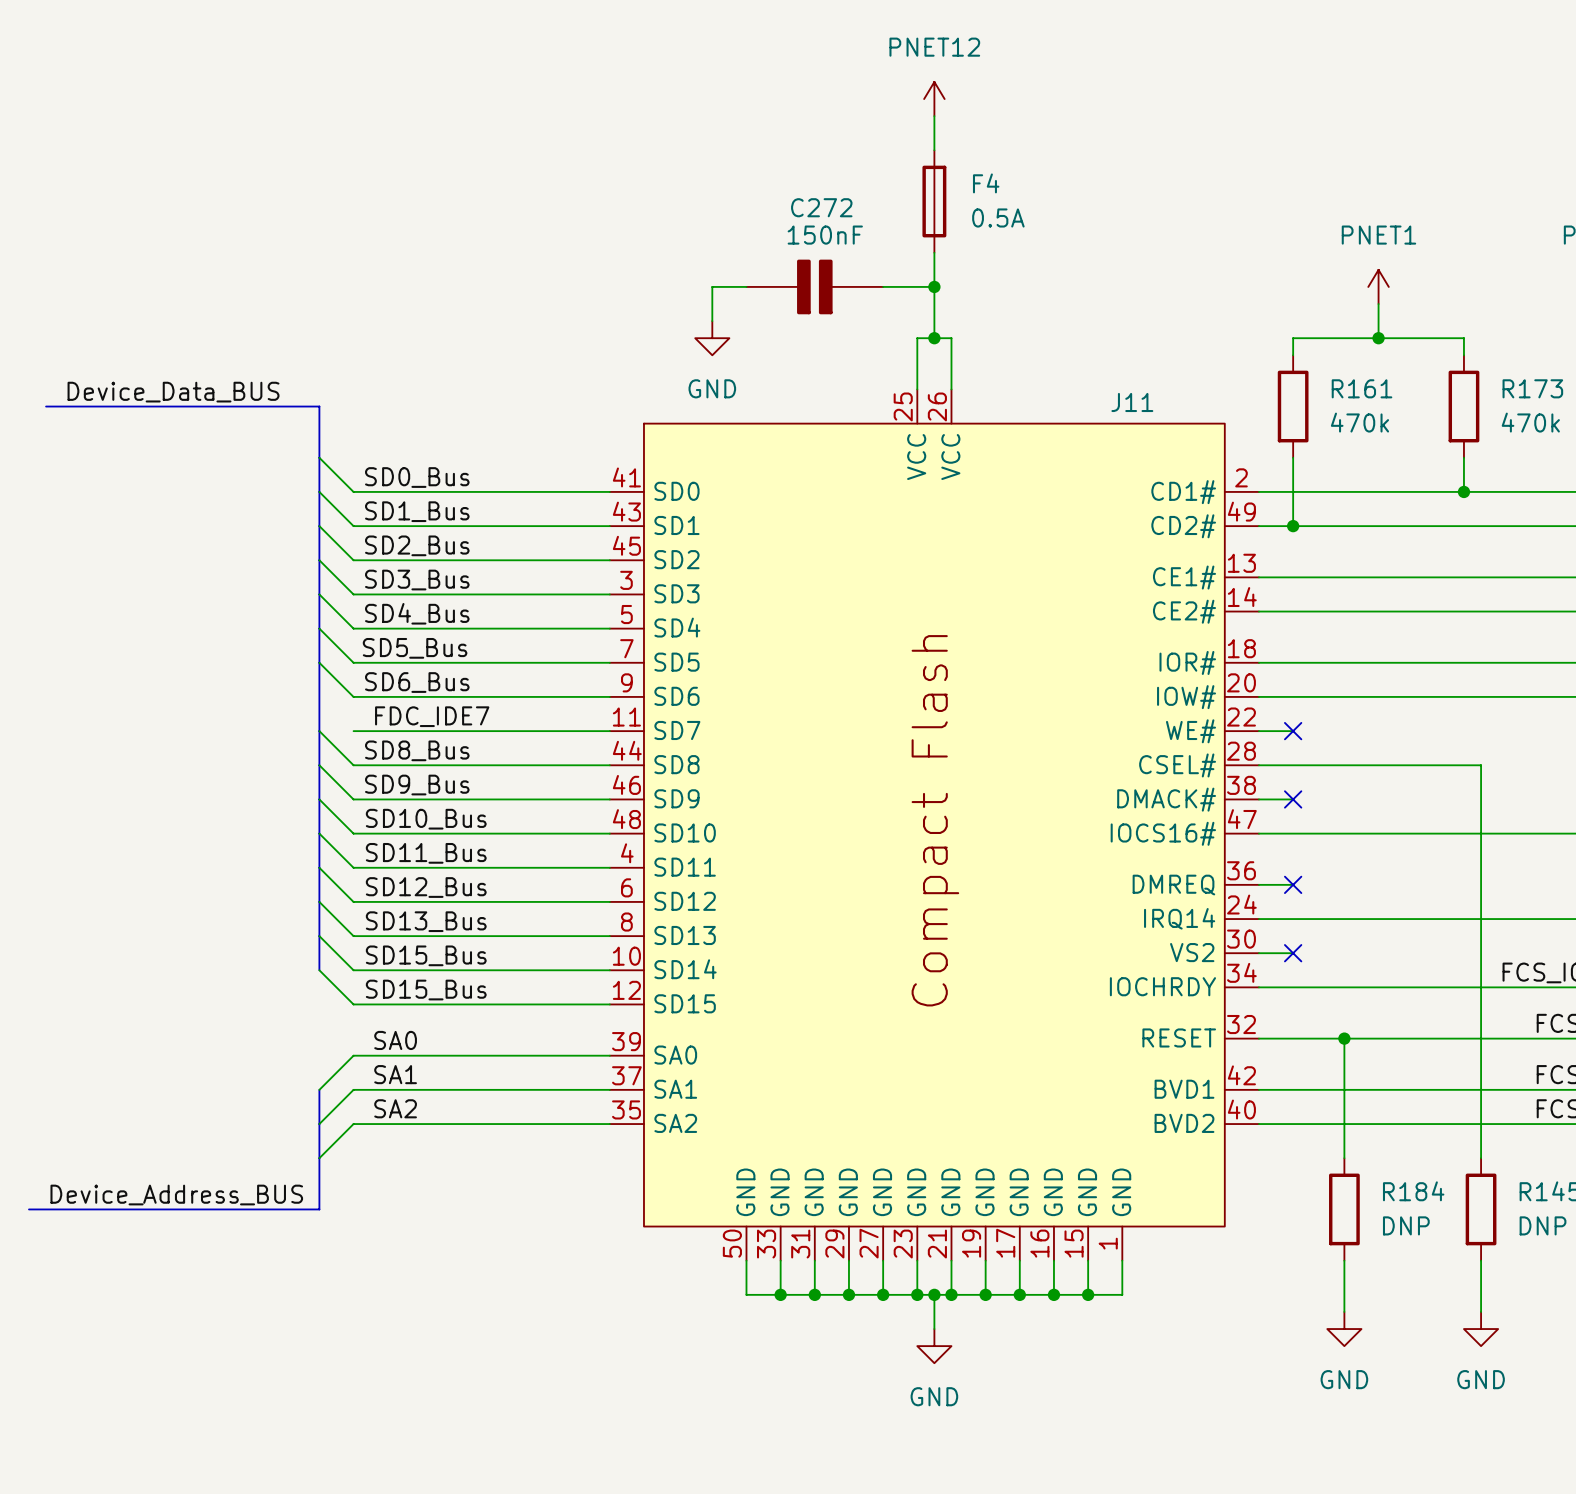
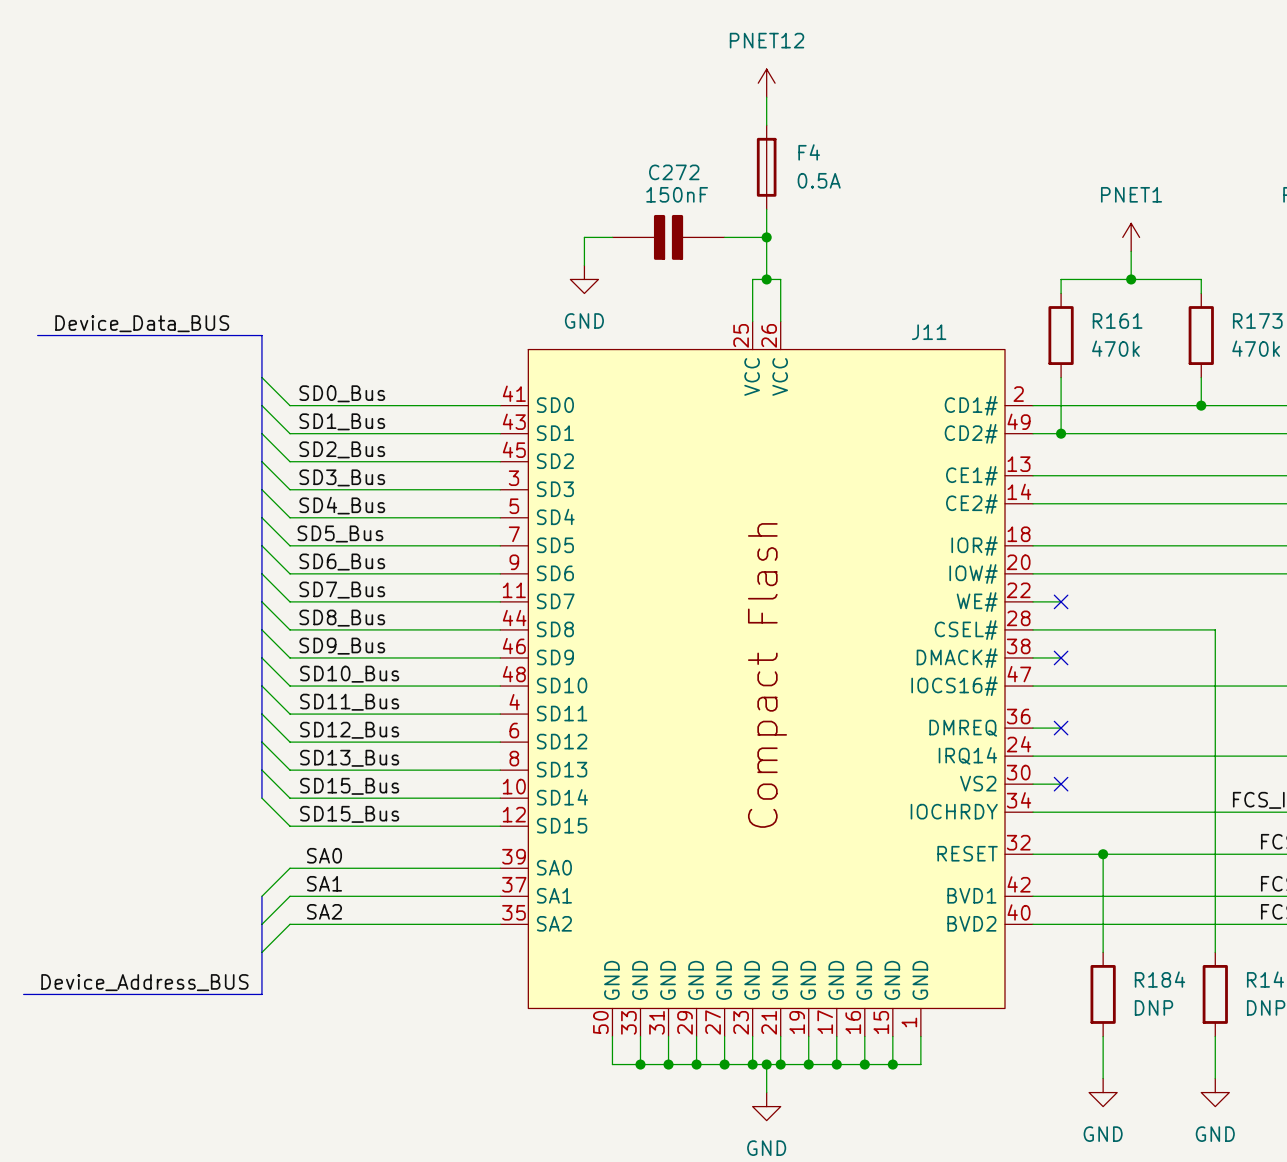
wire: none -> (261, 573) (290, 601)
label: none -> SD7_Bus (342, 590)
label: FDC_IDE7 (432, 716) -> none

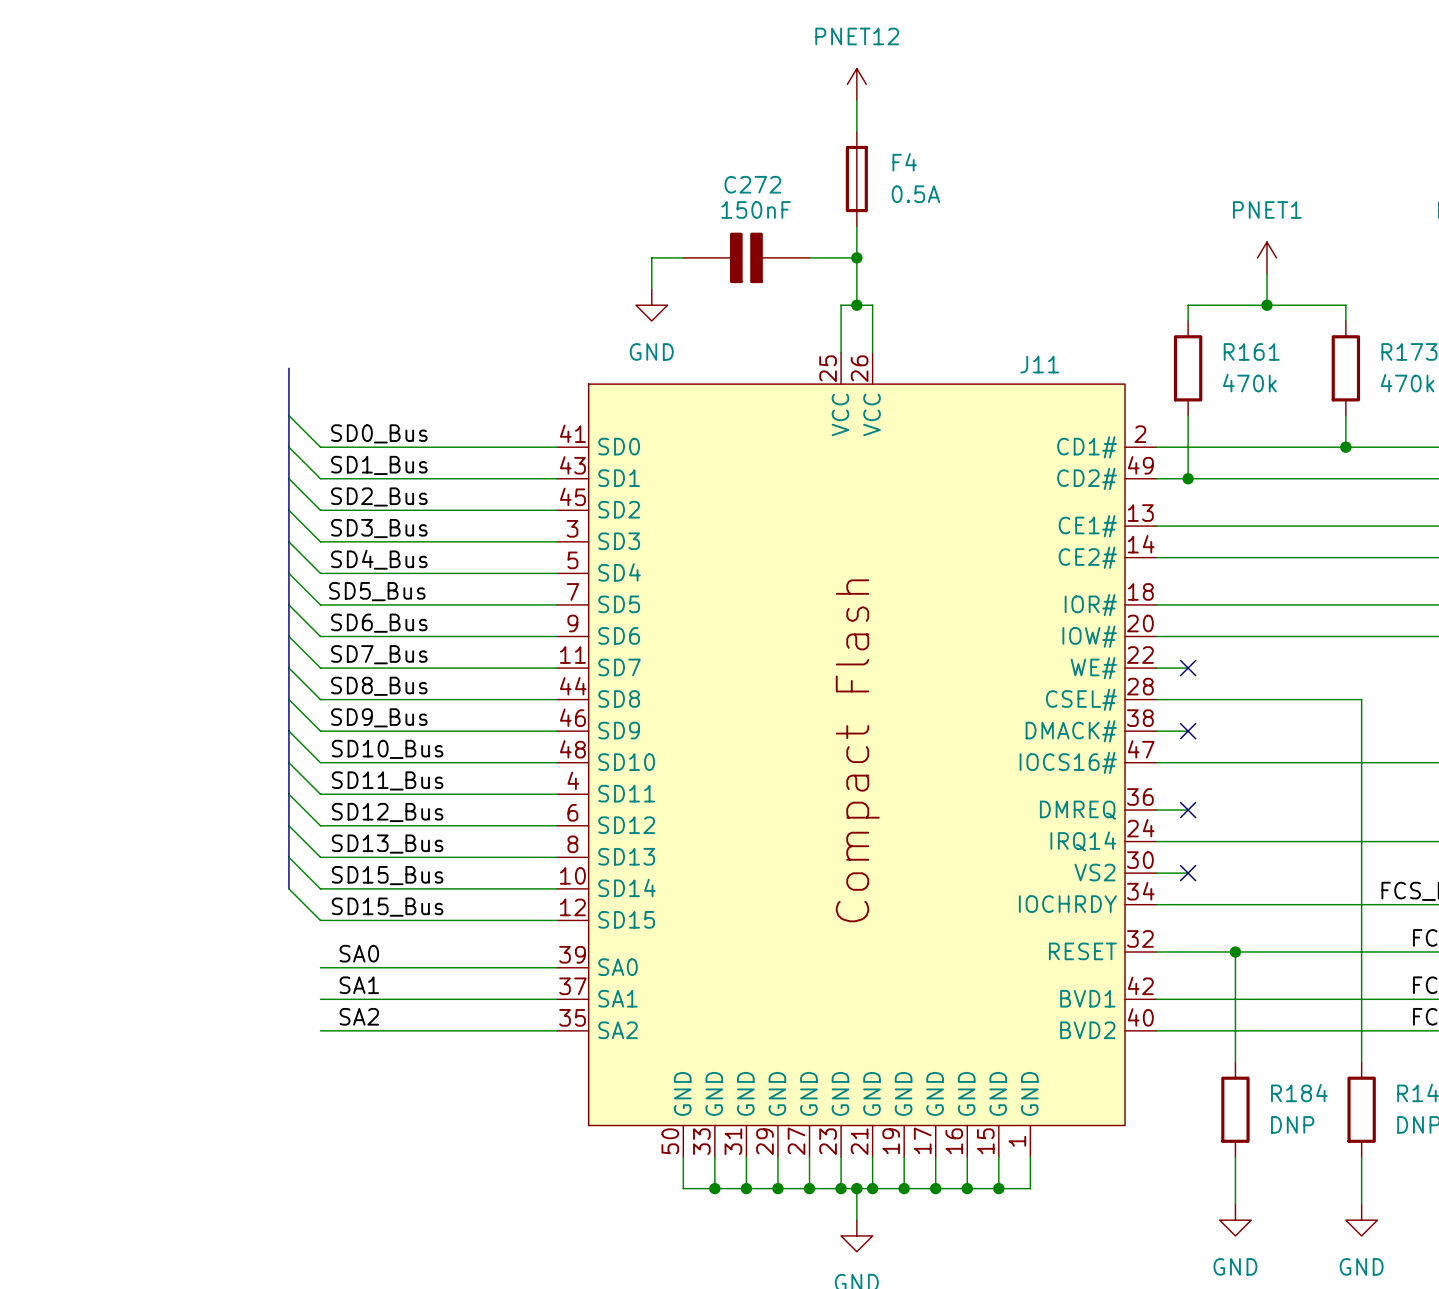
label: Device_Data_BUS (142, 323) -> none
bus: (37, 335) (261, 335) -> none
wire: (290, 868) (261, 896) -> none
bus: (261, 896) (261, 994) (23, 994) -> none
wire: (290, 896) (261, 924) -> none
wire: (290, 924) (261, 952) -> none
label: Device_Address_BUS (144, 982) -> none

